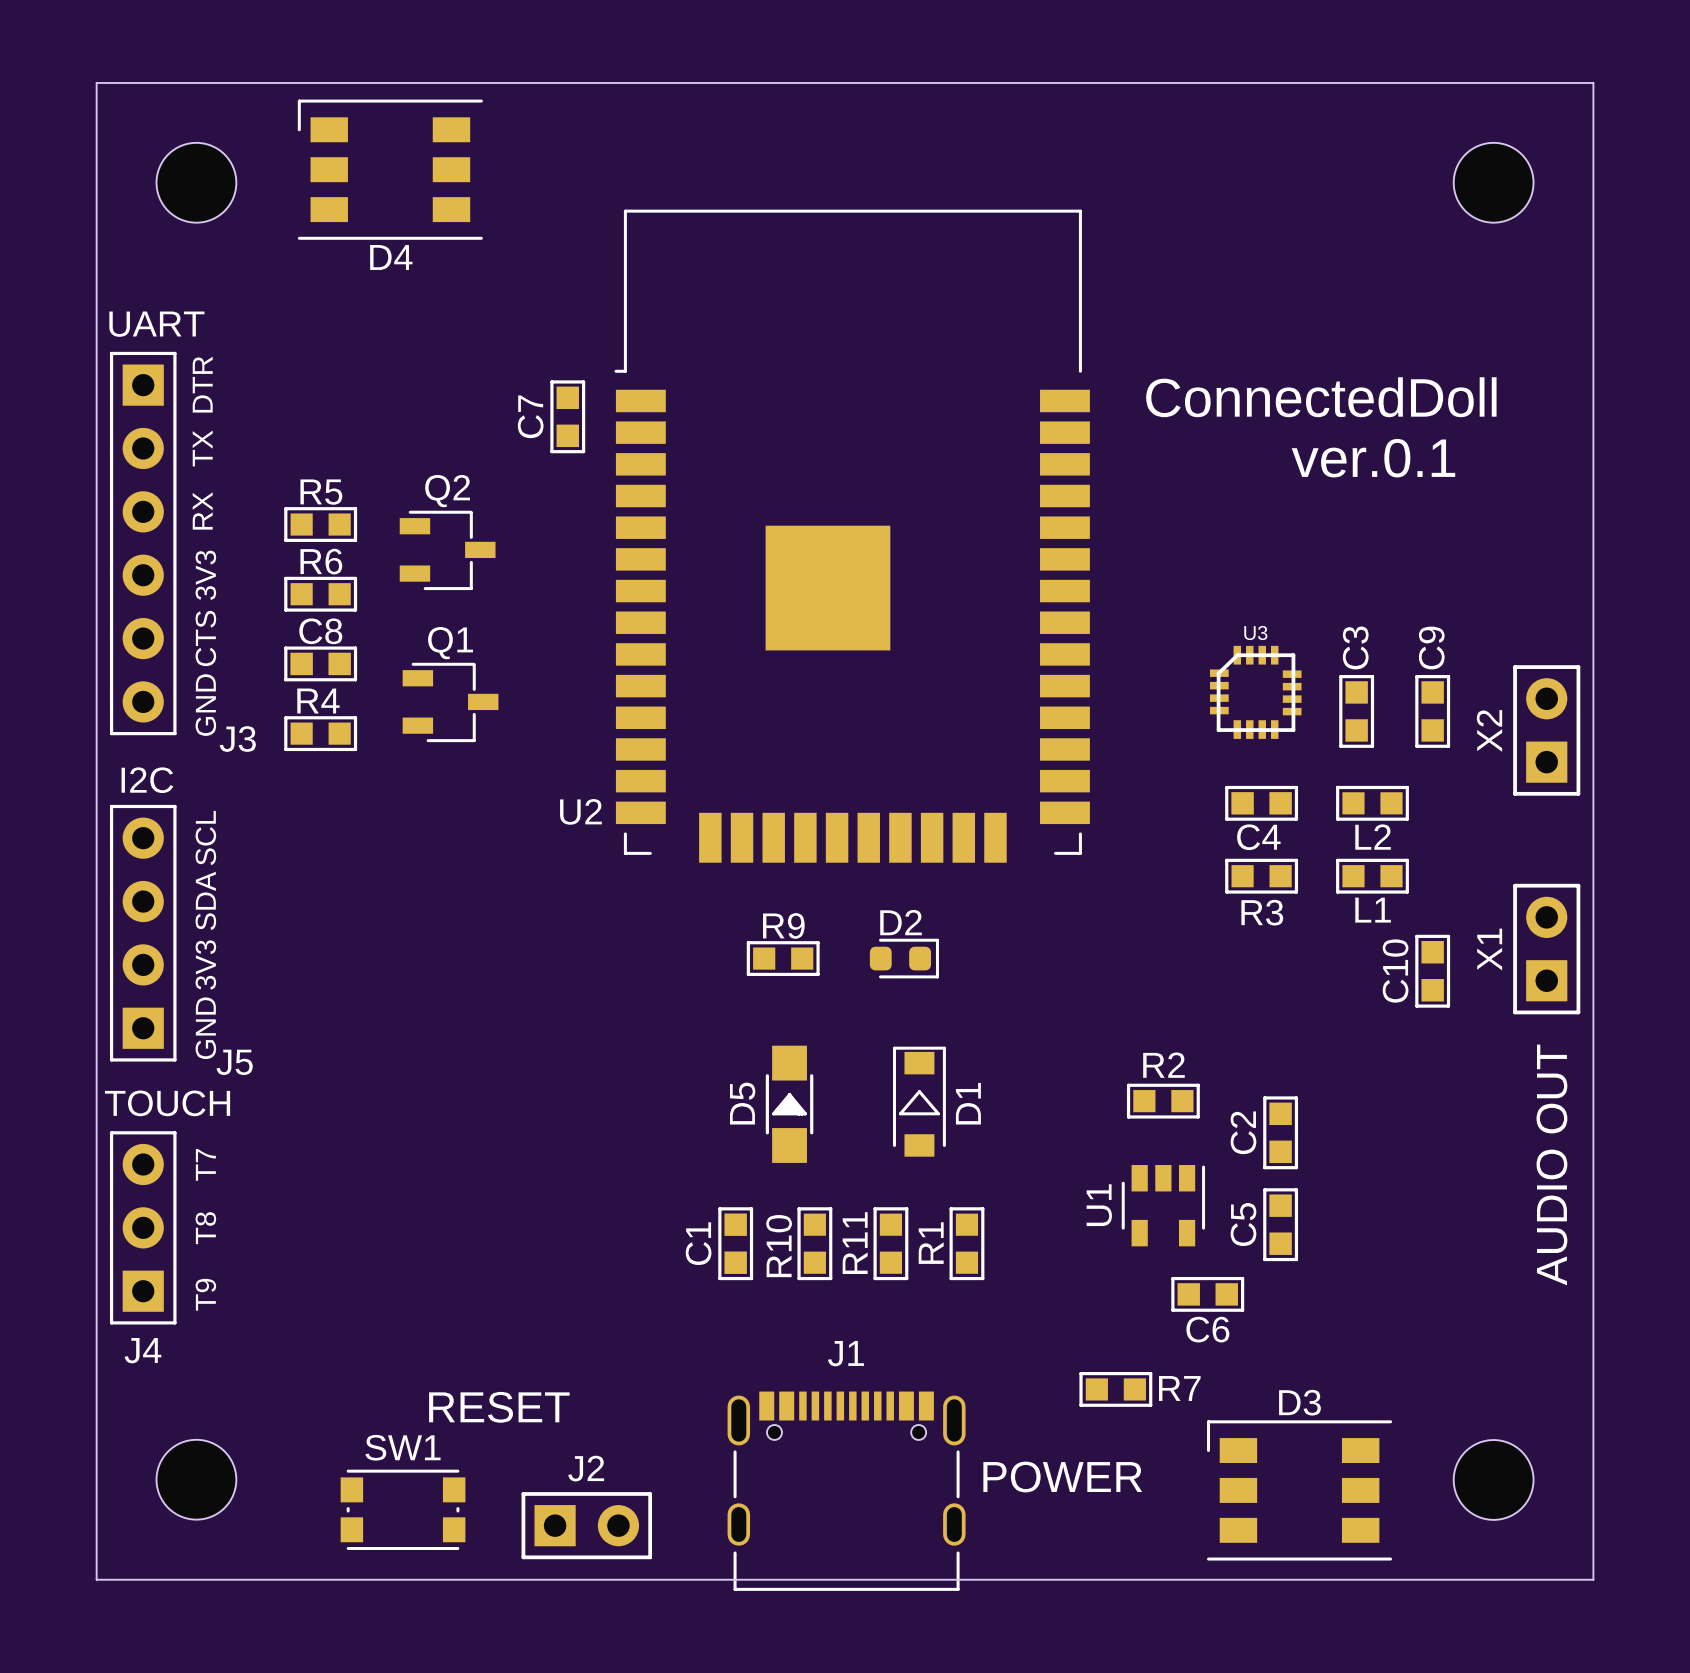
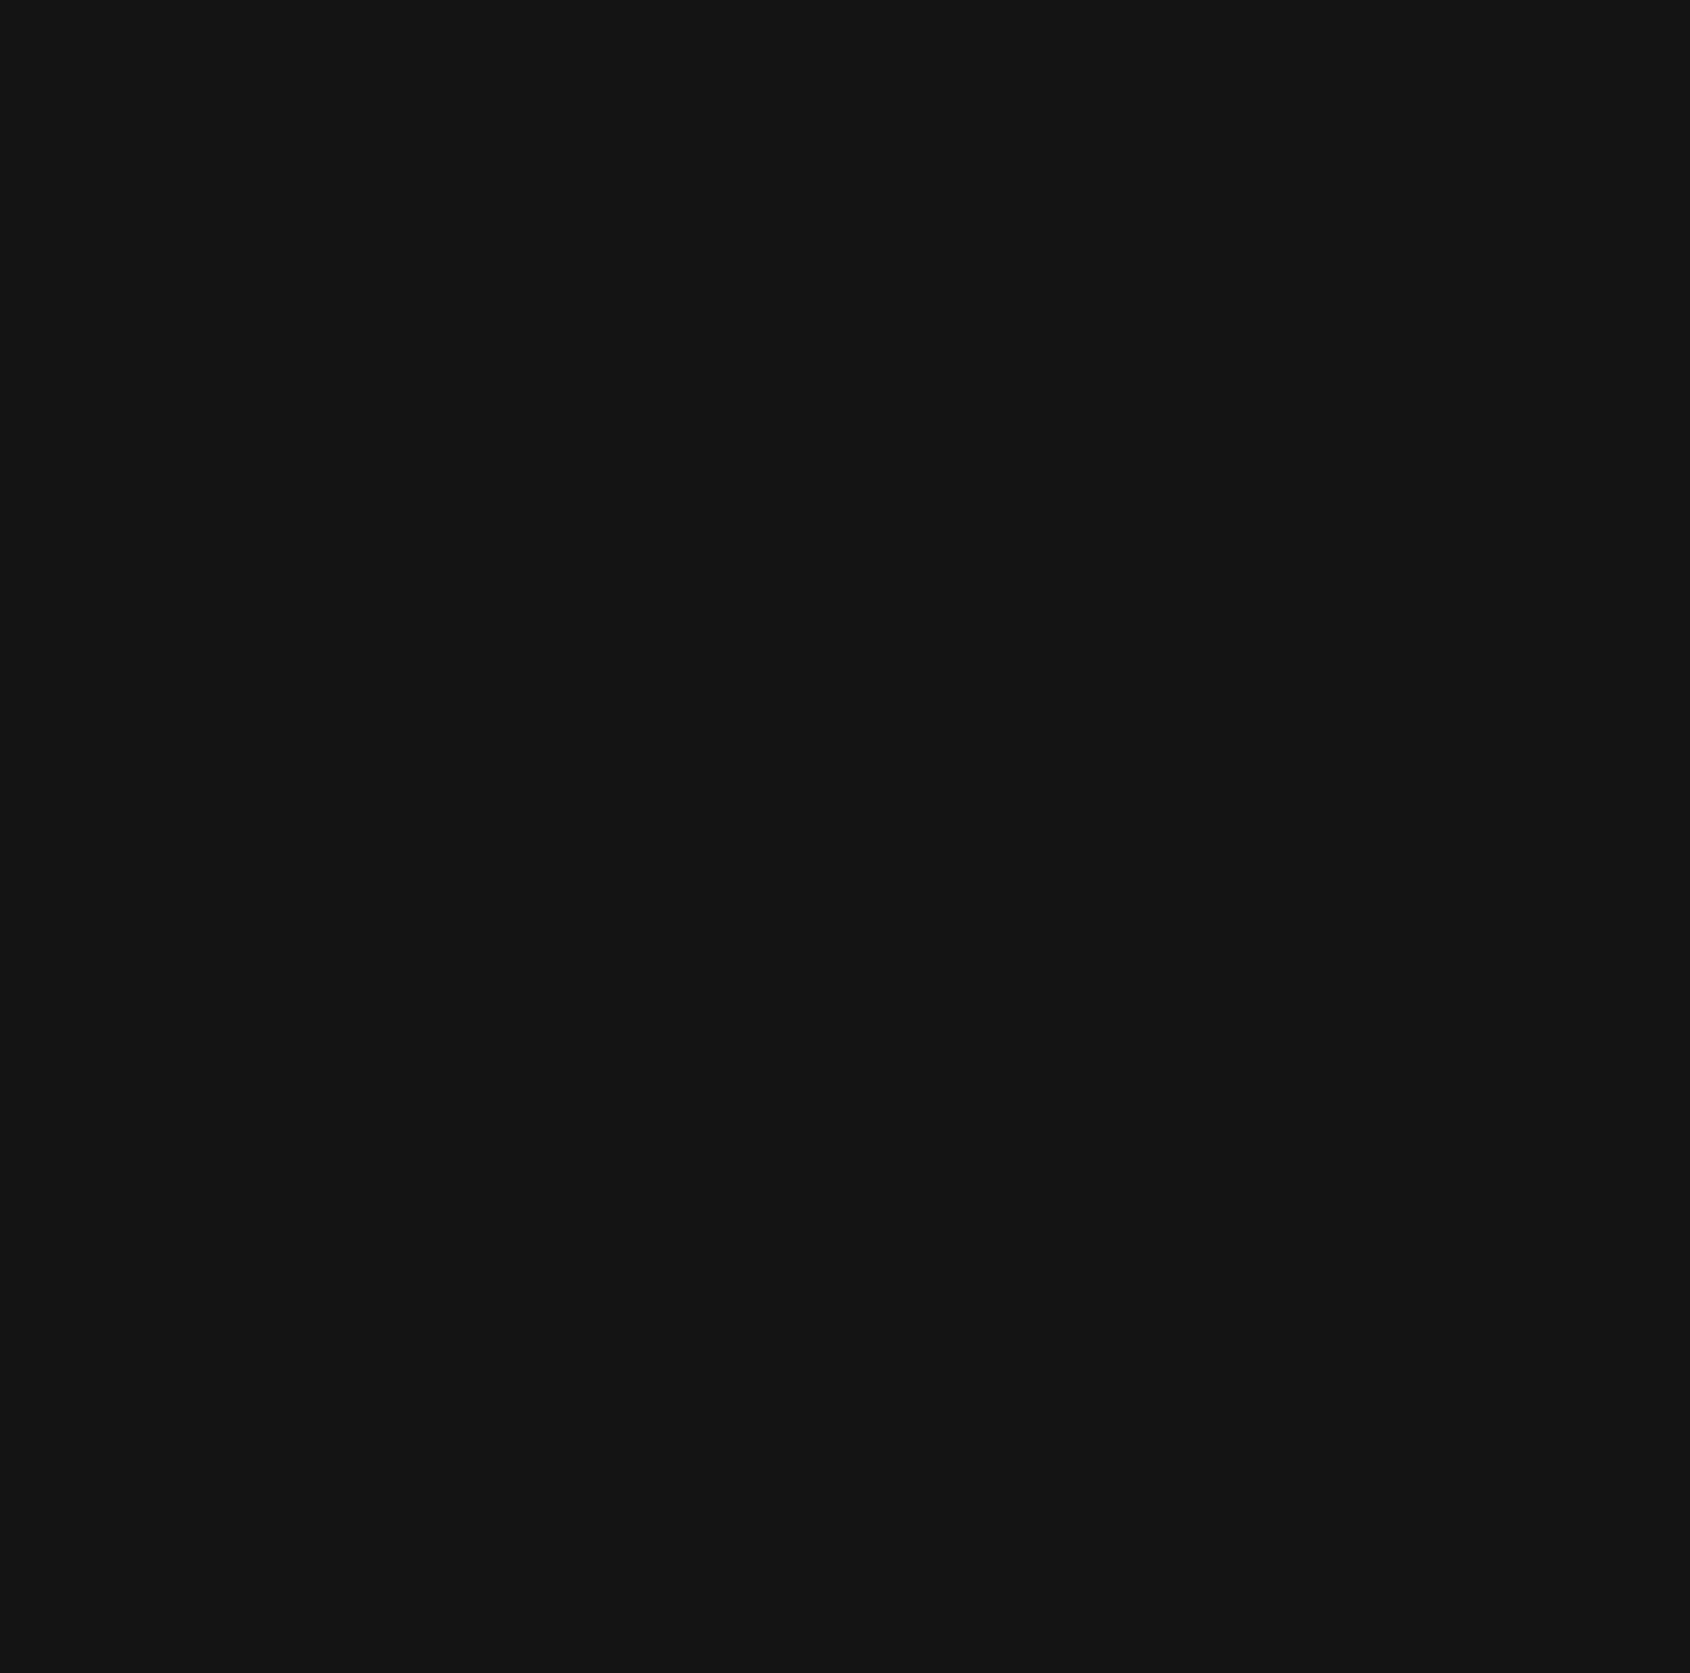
board edge: (96, 82) (1593, 82) (1593, 1579) (96, 1579) (96, 82) -> none
D4: (390, 169) -> none
part: (196, 182) -> none
part: (1493, 182) -> none
text: UART (156, 324) -> none
text: DTR (202, 384) -> none
text: ConnectedDoll (1321, 397) -> none
C7: (567, 416) -> none
text: TX (202, 448) -> none
text: ver.0.1 (1373, 458) -> none
text: RX (202, 510) -> none
R5: (320, 524) -> none
U2: (852, 536) -> none
J3: (143, 543) -> none
Q2: (447, 550) -> none
text: 3V3 (205, 575) -> none
R6: (320, 594) -> none
text: CTS (205, 638) -> none
C8: (320, 663) -> none
U3: (1255, 692) -> none
Q1: (450, 702) -> none
text: GND (205, 705) -> none
C3: (1356, 711) -> none
C9: (1432, 711) -> none
X2: (1546, 730) -> none
R4: (320, 733) -> none
text: I2C (147, 780) -> none
C4: (1261, 803) -> none
L2: (1372, 803) -> none
text: SCL (205, 837) -> none
R3: (1261, 876) -> none
L1: (1372, 876) -> none
text: SDA (205, 900) -> none
J5: (143, 933) -> none
X1: (1546, 949) -> none
R9: (783, 958) -> none
D2: (904, 958) -> none
text: 3V3 (205, 964) -> none
C10: (1432, 971) -> none
text: GND (205, 1028) -> none
line: (919, 1091) (938, 1113) (900, 1113) (919, 1091) -> none
D1: (919, 1101) -> none
R2: (1163, 1101) -> none
text: TOUCH (167, 1103) -> none
D5: (789, 1104) -> none
C2: (1280, 1132) -> none
text: T7 (205, 1164) -> none
text: AUDIO OUT (1551, 1164) -> none
U1: (1163, 1205) -> none
C5: (1280, 1224) -> none
J4: (143, 1227) -> none
text: T8 (205, 1228) -> none
C1: (735, 1243) -> none
R10: (814, 1243) -> none
R11: (890, 1243) -> none
R1: (966, 1243) -> none
text: T9 (205, 1294) -> none
C6: (1207, 1294) -> none
R7: (1115, 1389) -> none
text: RESET (499, 1407) -> none
text: POWER (1062, 1477) -> none
part: (196, 1479) -> none
part: (1493, 1479) -> none
D3: (1299, 1490) -> none
J1: (846, 1491) -> none
SW1: (403, 1509) -> none
J2: (586, 1525) -> none

